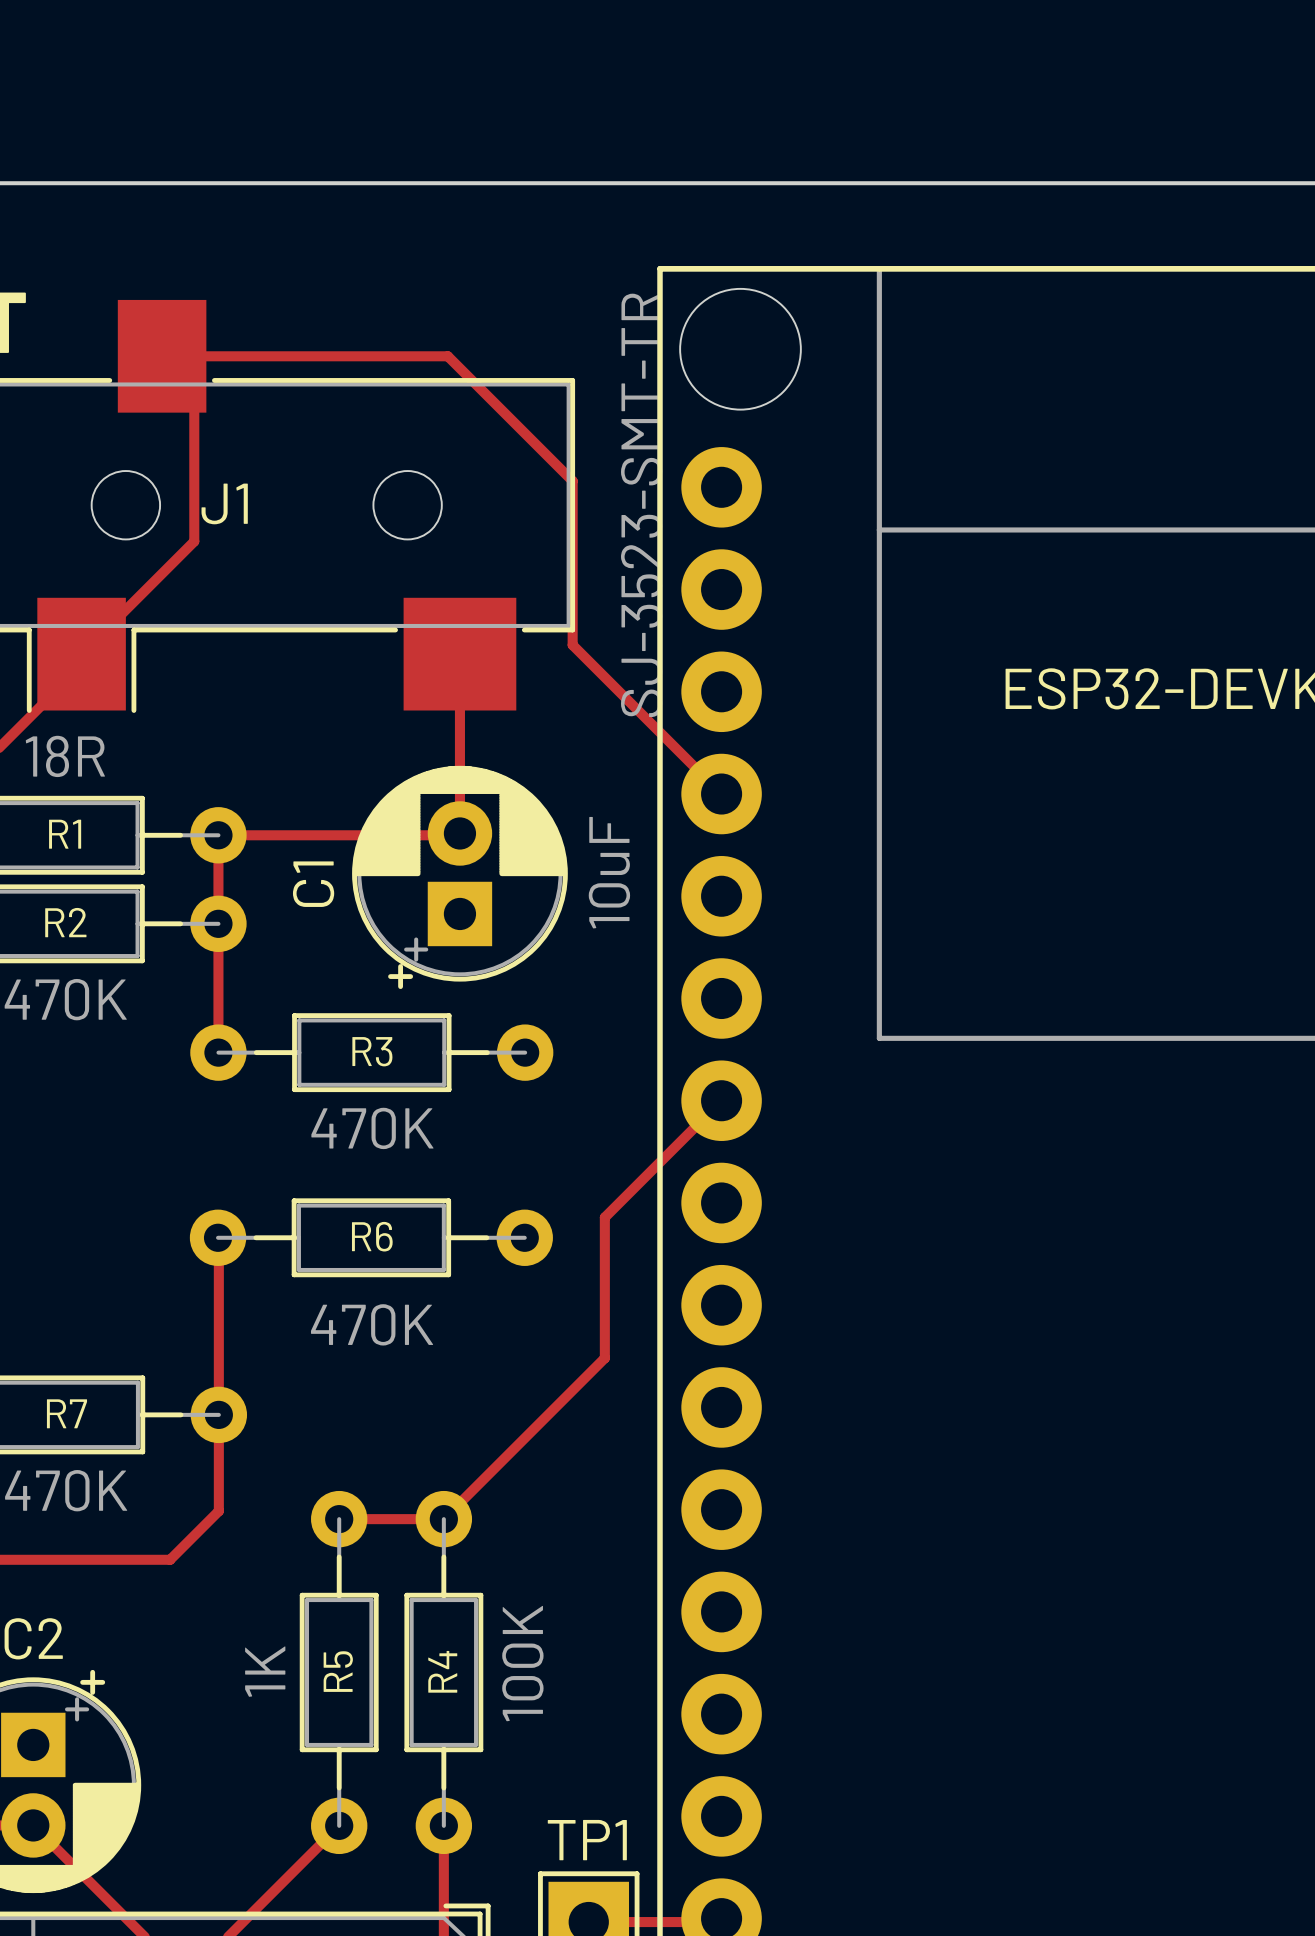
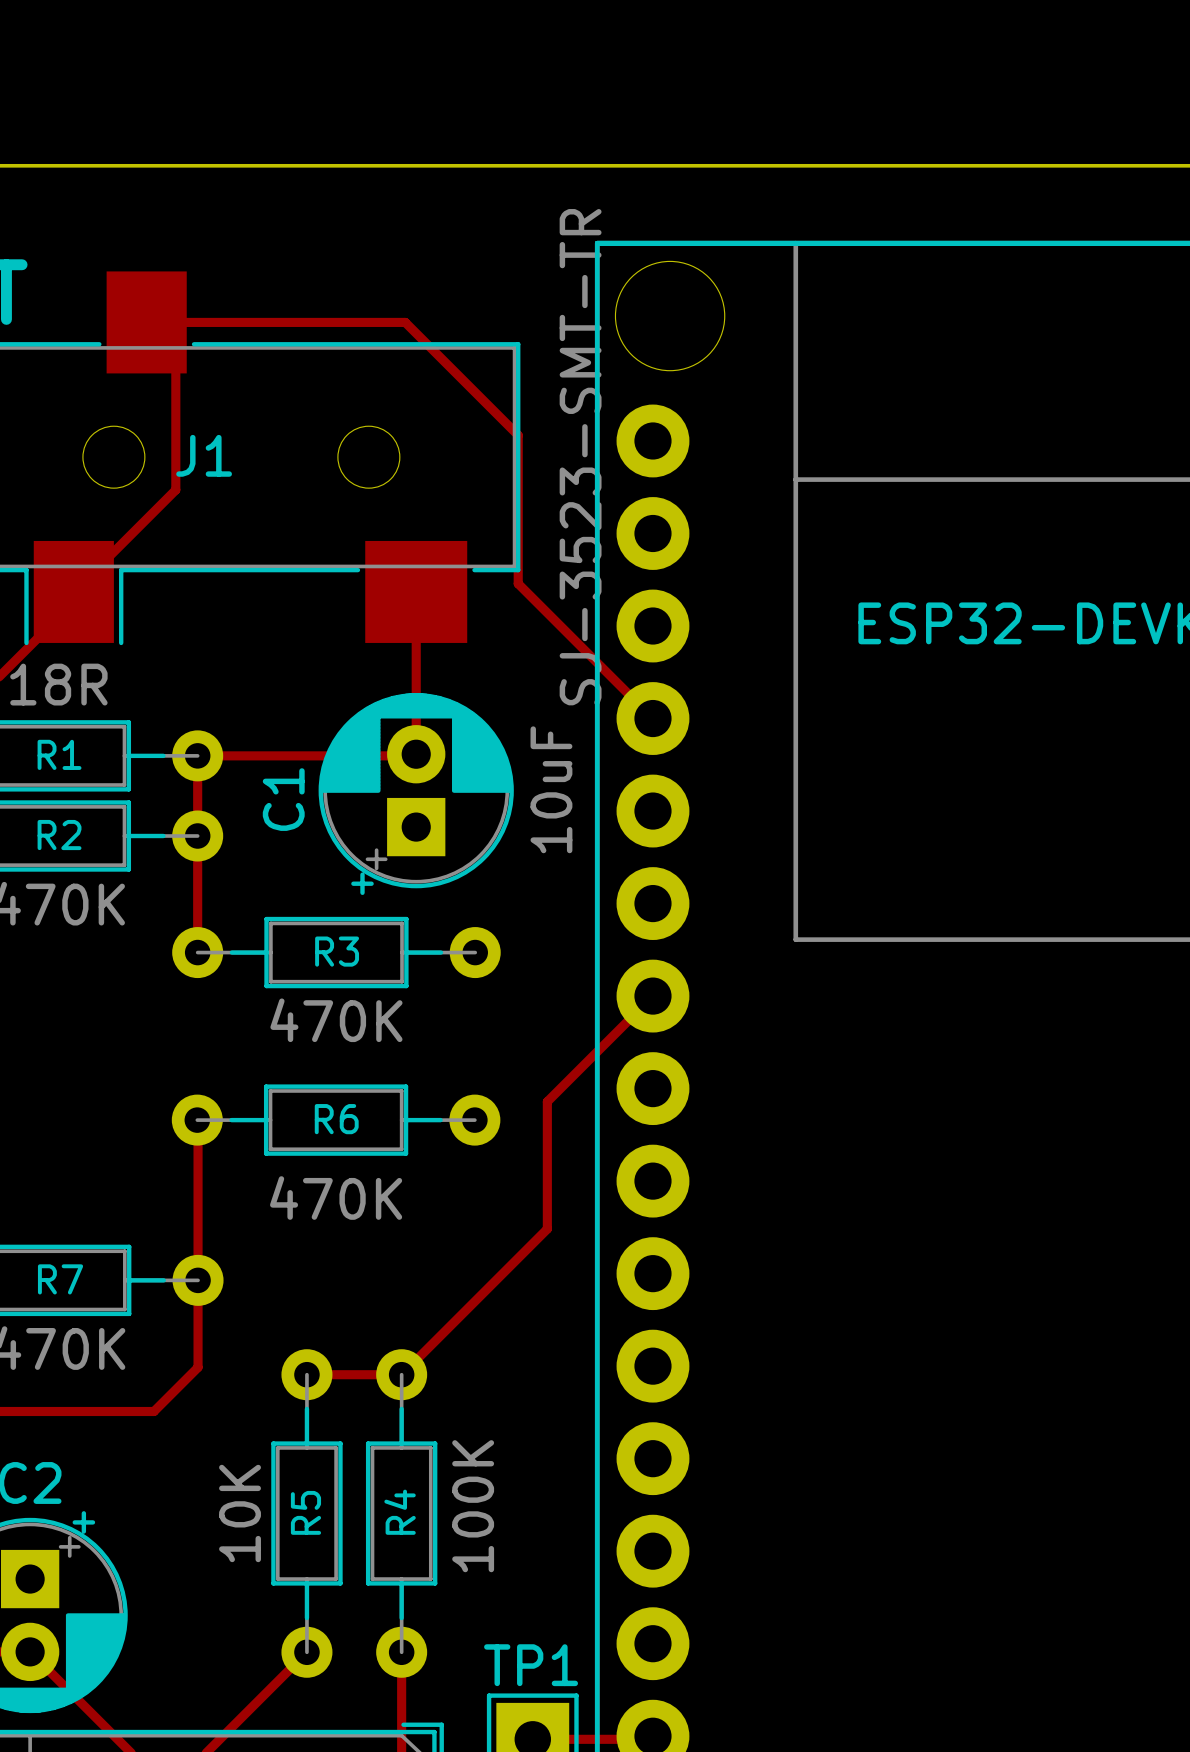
R5 value: 1K (265, 1671) -> 10K (240, 1513)

